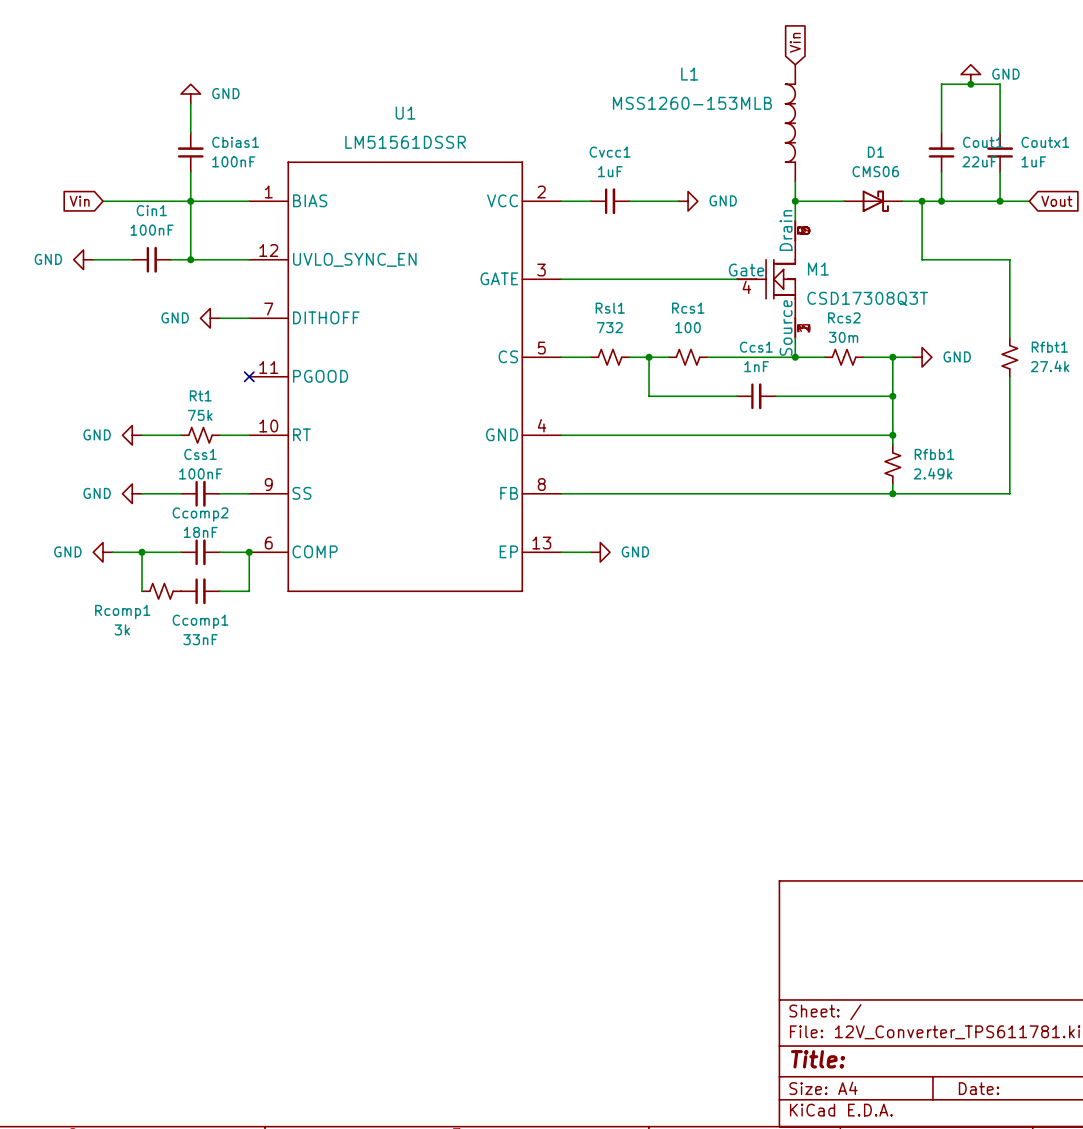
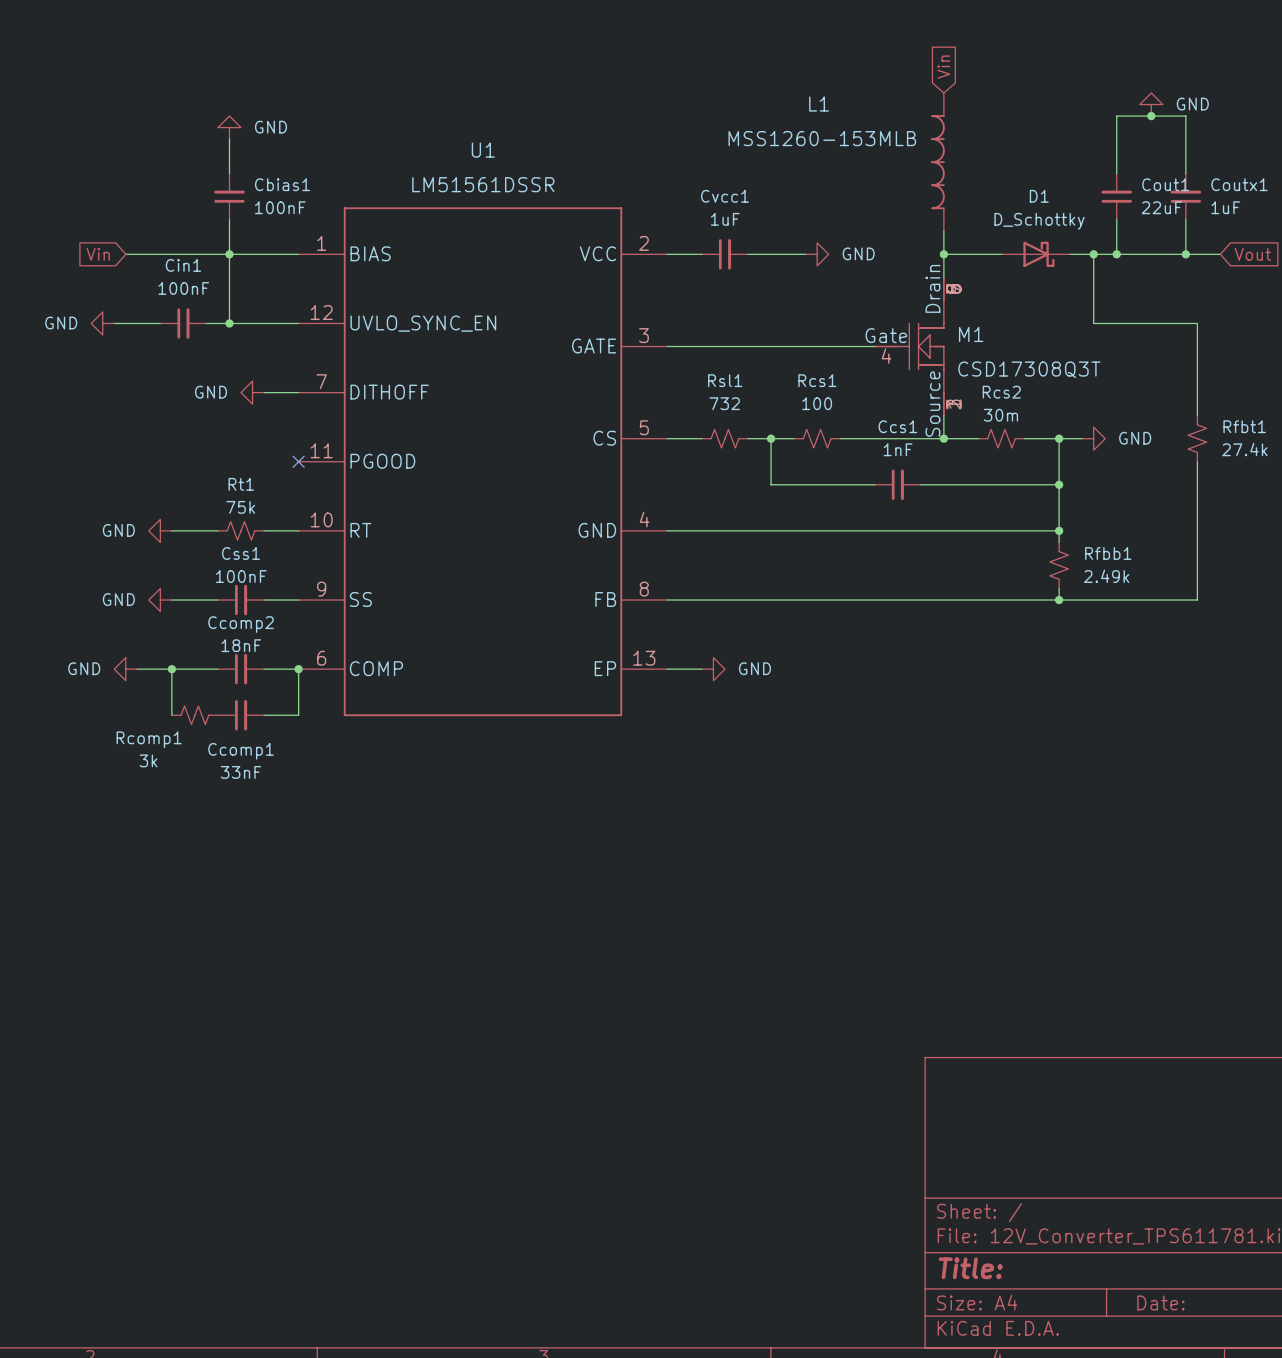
D1 value: CMS06 (875, 171) -> D_Schottky (1039, 221)

